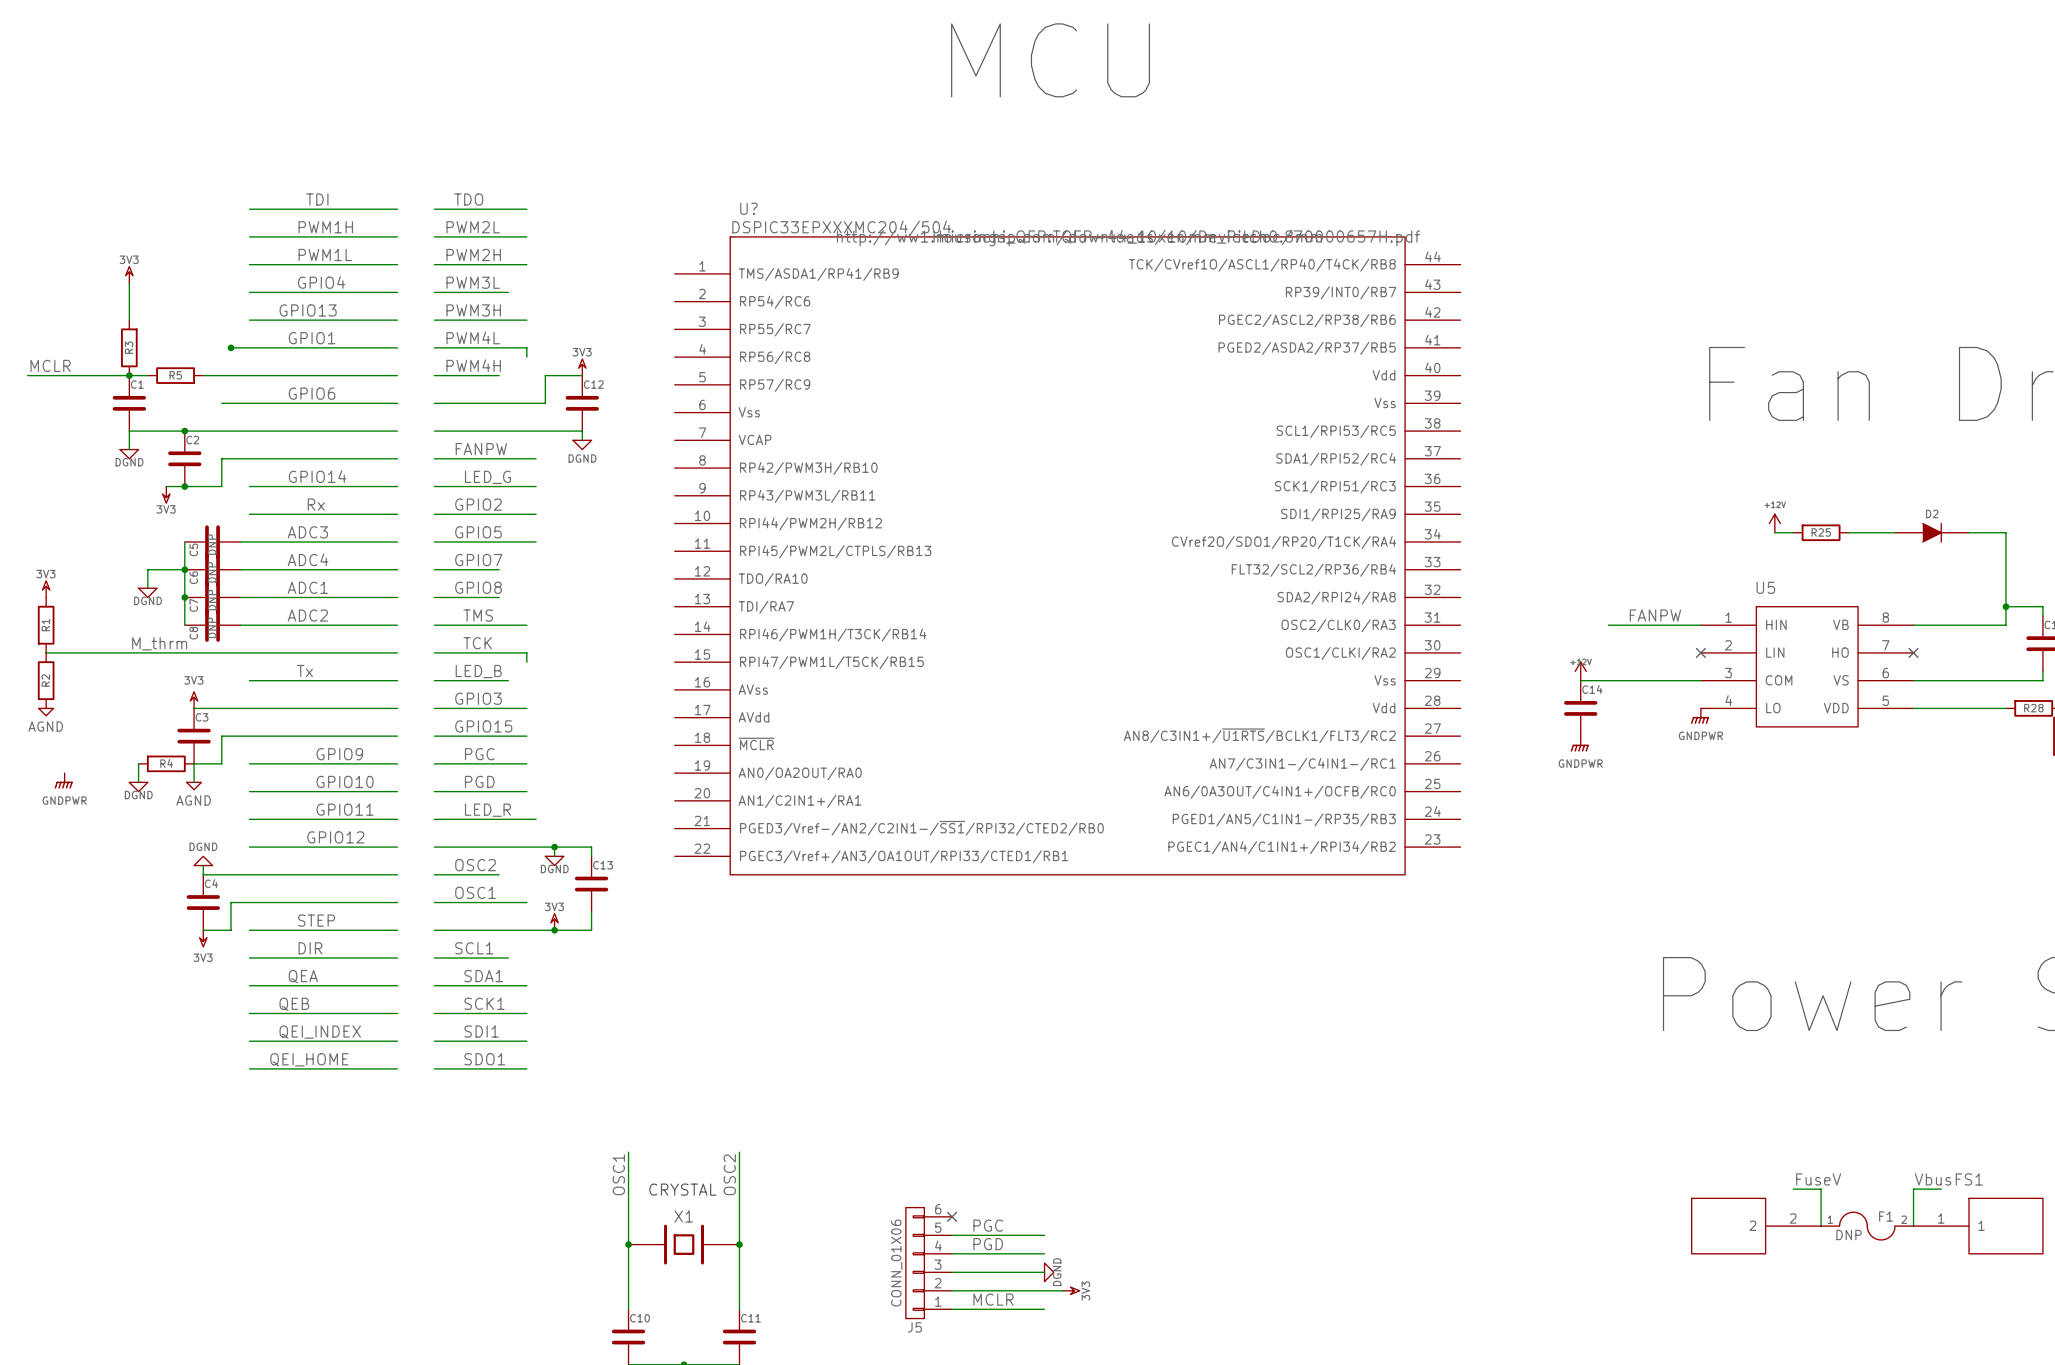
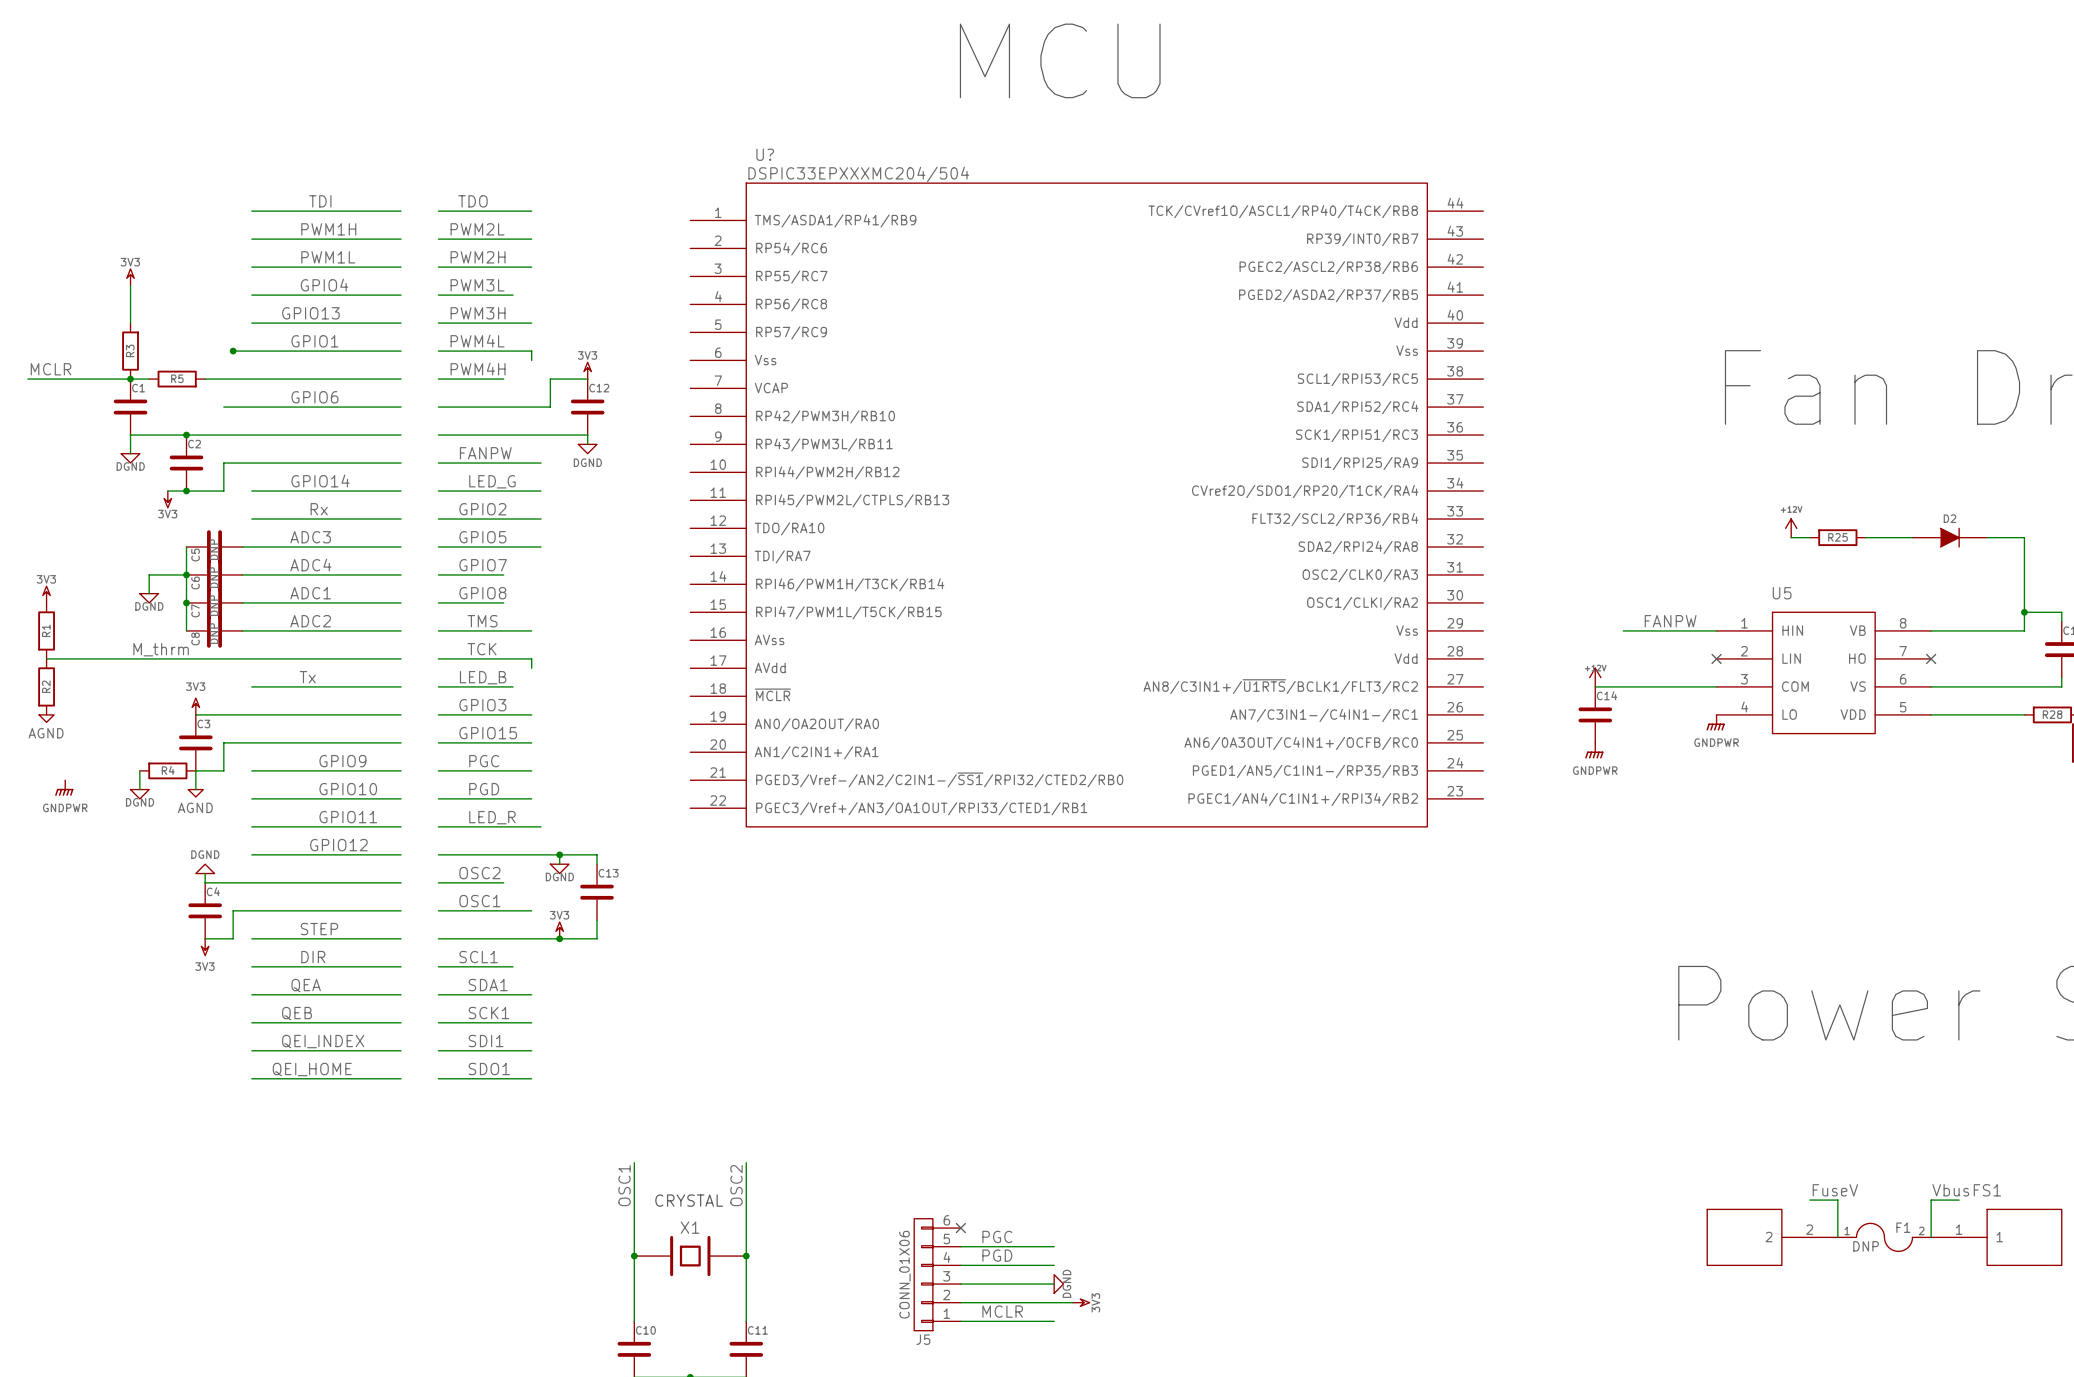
U?: none -> DSPIC33EPXXXMC204/504 (1086, 505)
U?: DSPIC33EPXXXMC204/504 (1067, 555) -> none

